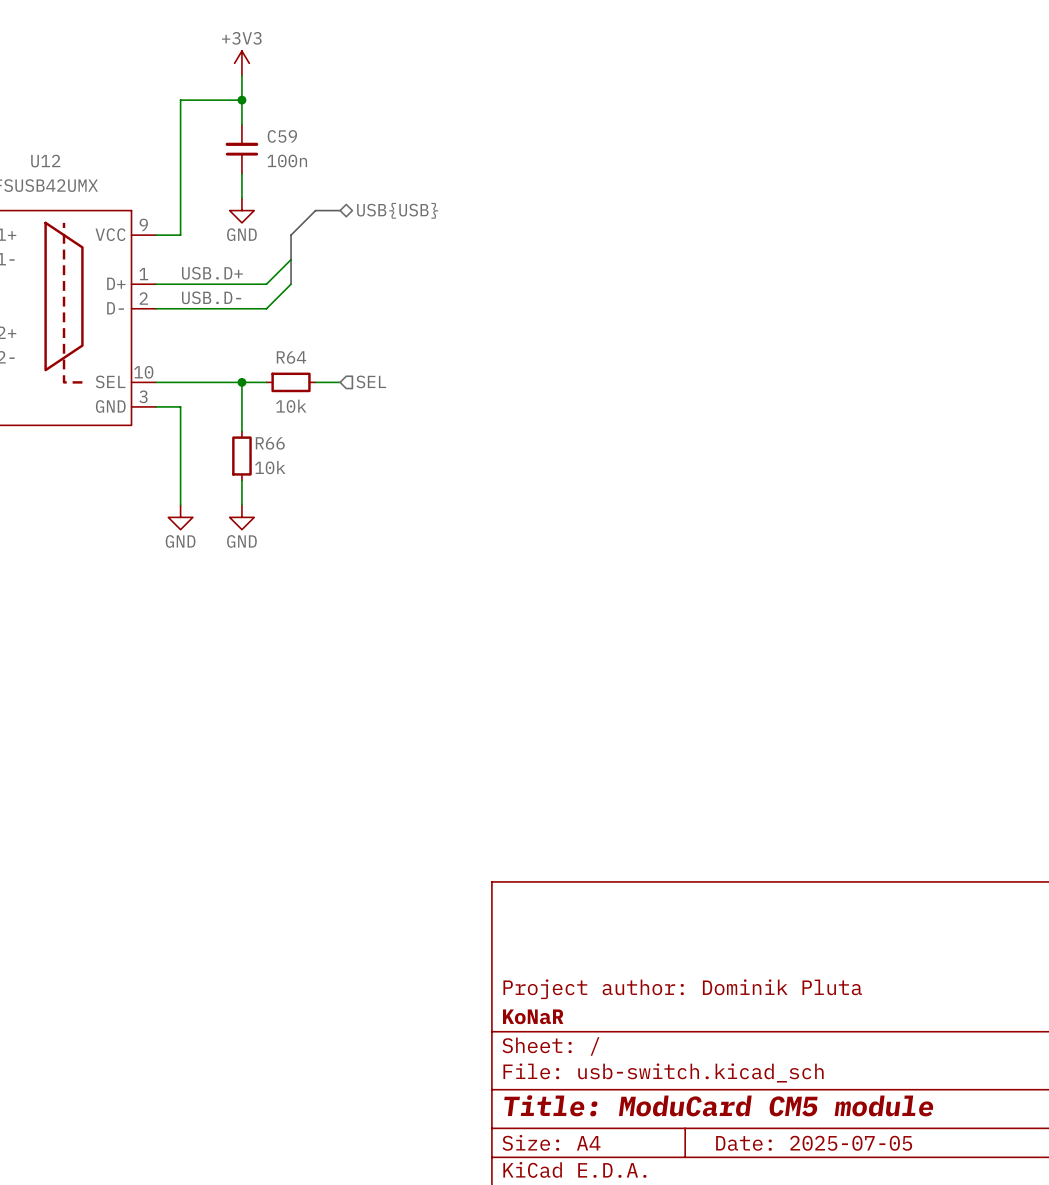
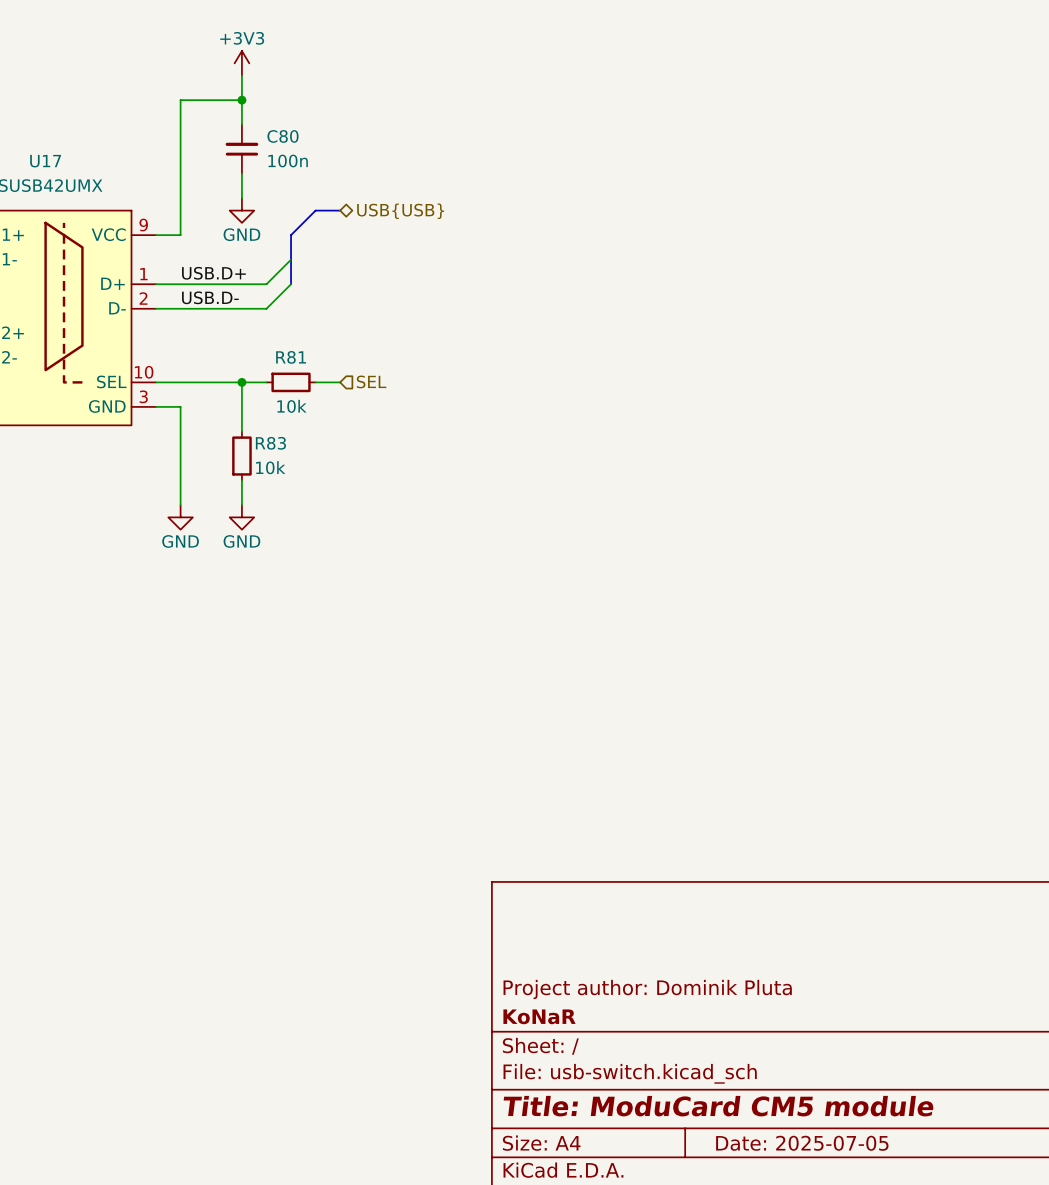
C59 name: C59 (282, 136) -> C80 (282, 136)
U12 name: U12 (45, 161) -> U17 (45, 161)
R64 name: R64 (291, 357) -> R81 (291, 357)
R66 name: R66 (270, 443) -> R83 (270, 443)

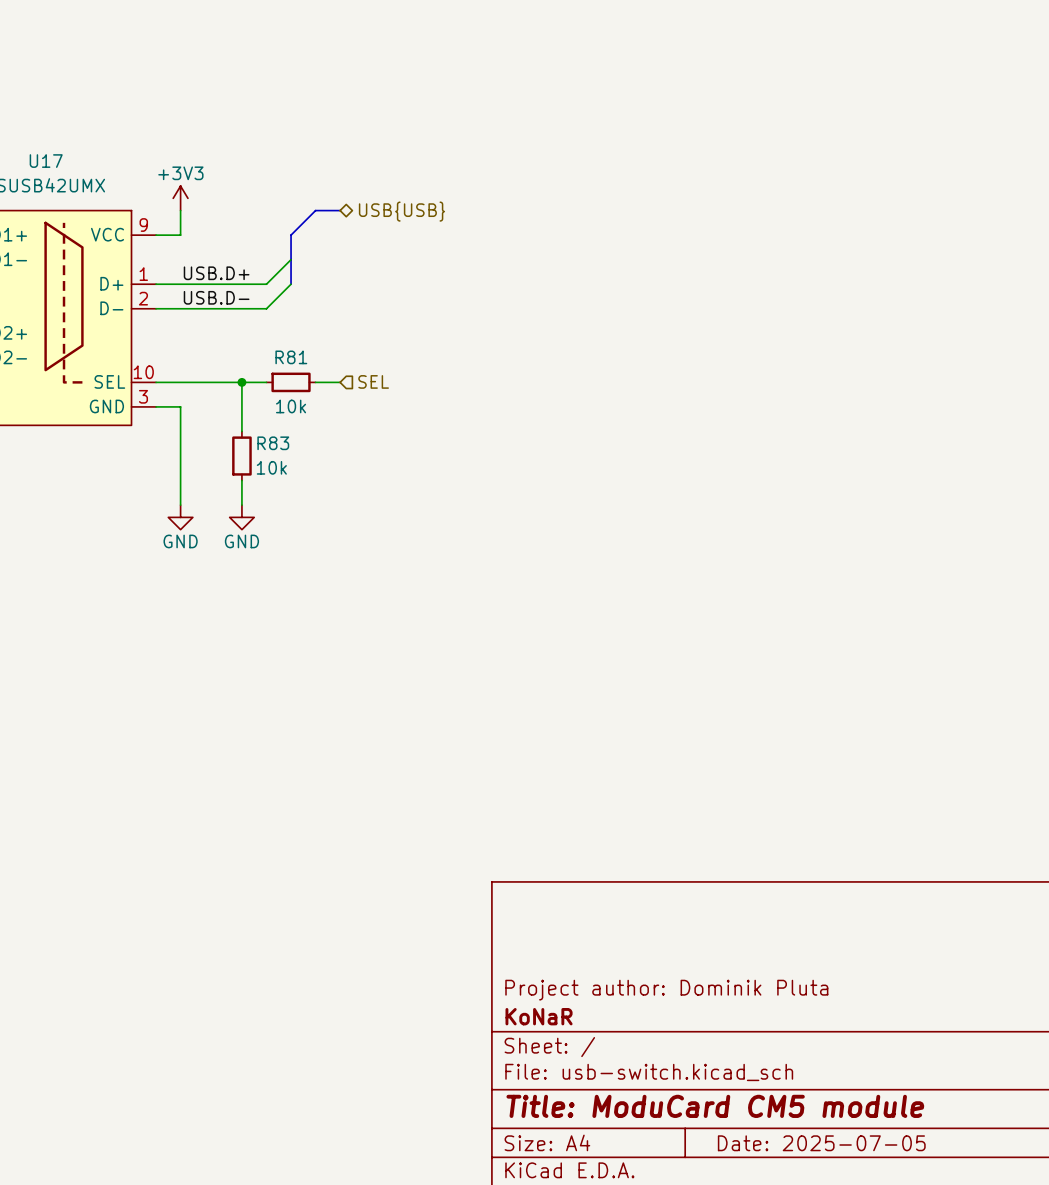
power symbol position: +3V3 (241, 63) -> +3V3 (180, 198)
wire: (241, 75) (241, 124) -> none
wire: (241, 100) (180, 100) (180, 210) -> none
junction: (241, 100) -> none
C80: (241, 149) -> none
wire: (241, 173) (241, 198) -> none
power symbol: GND (241, 210) -> none

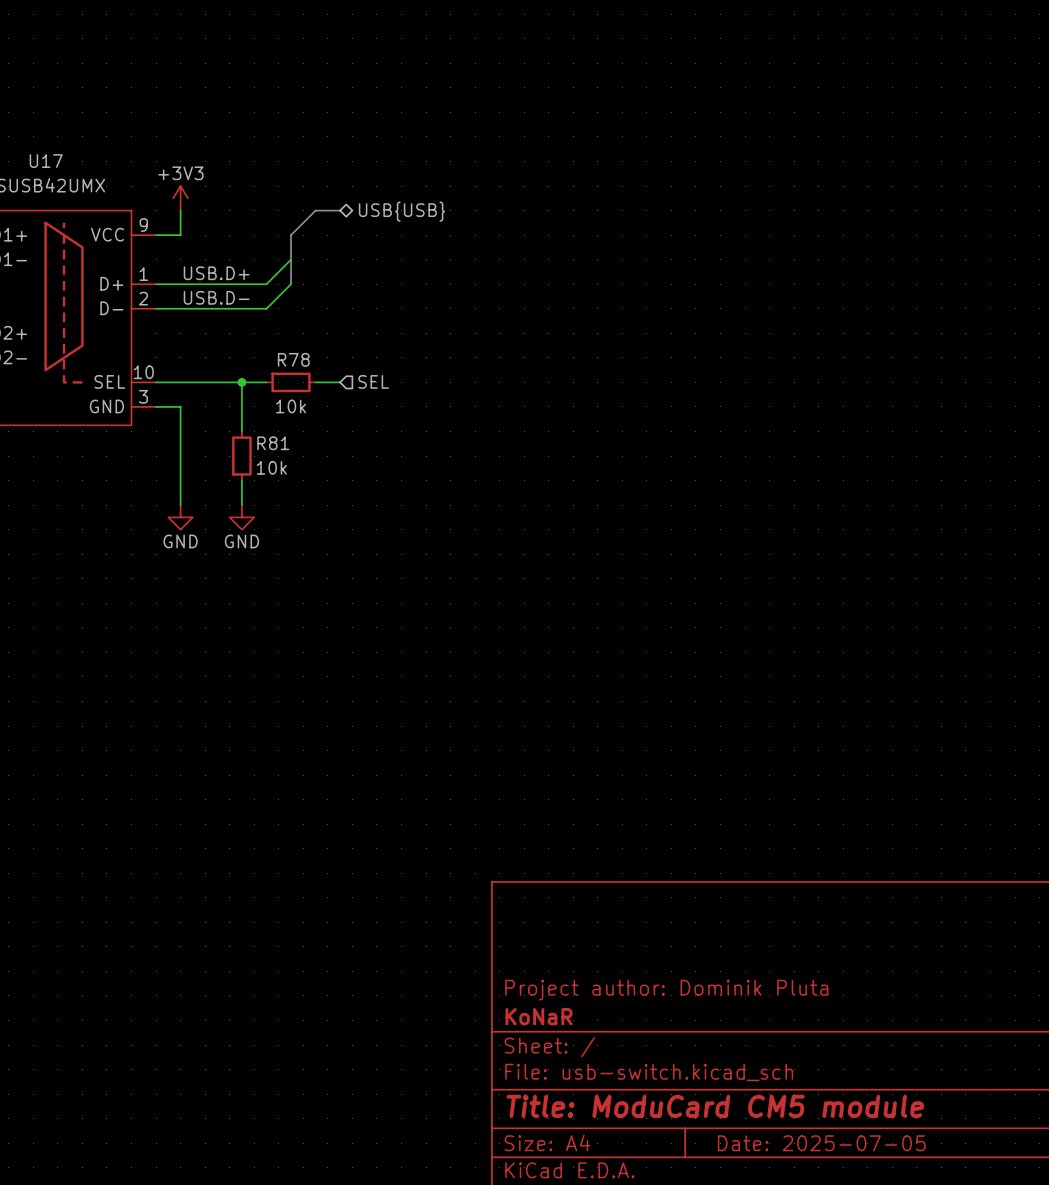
R81 name: R81 (291, 357) -> R78 (293, 359)
R83 name: R83 (273, 443) -> R81 (273, 443)

